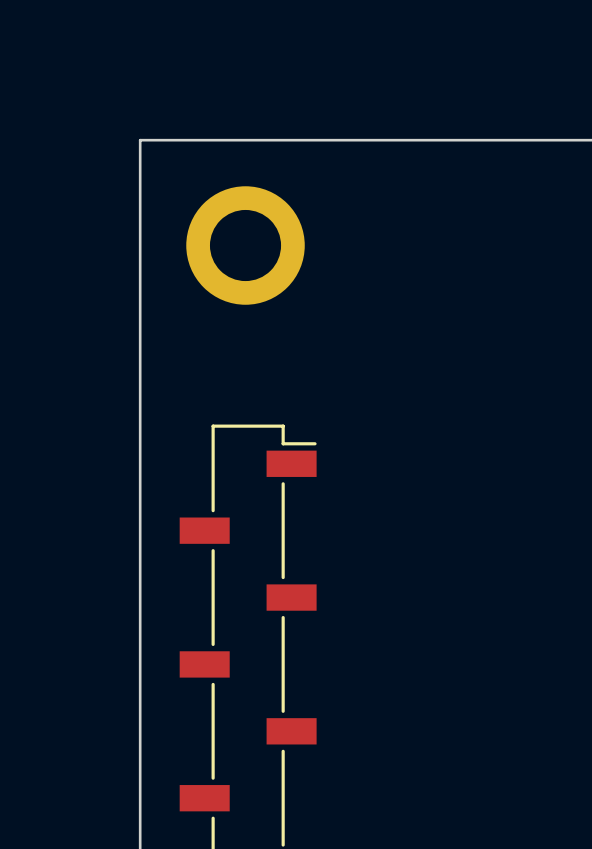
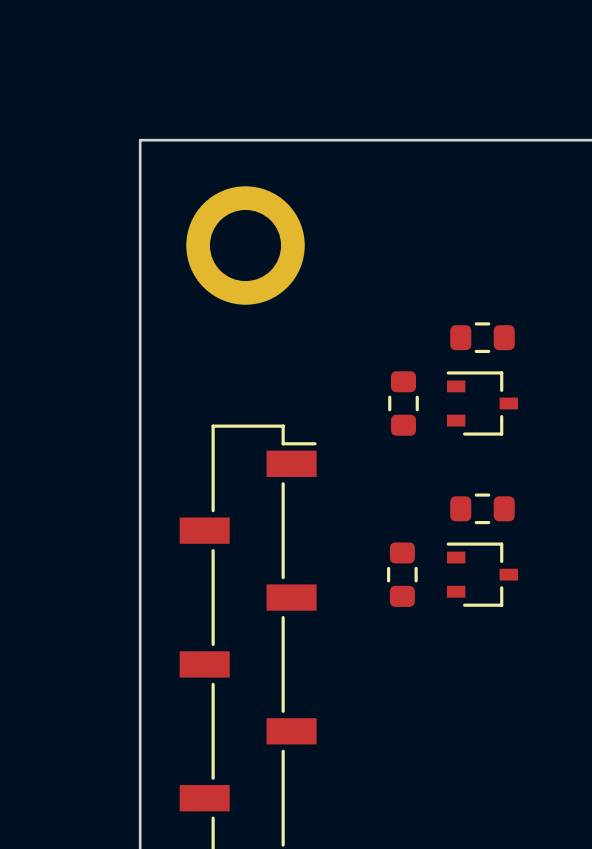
part: none -> (482, 337)
part: none -> (403, 403)
part: none -> (482, 403)
part: none -> (482, 508)
part: none -> (402, 574)
part: none -> (482, 574)

